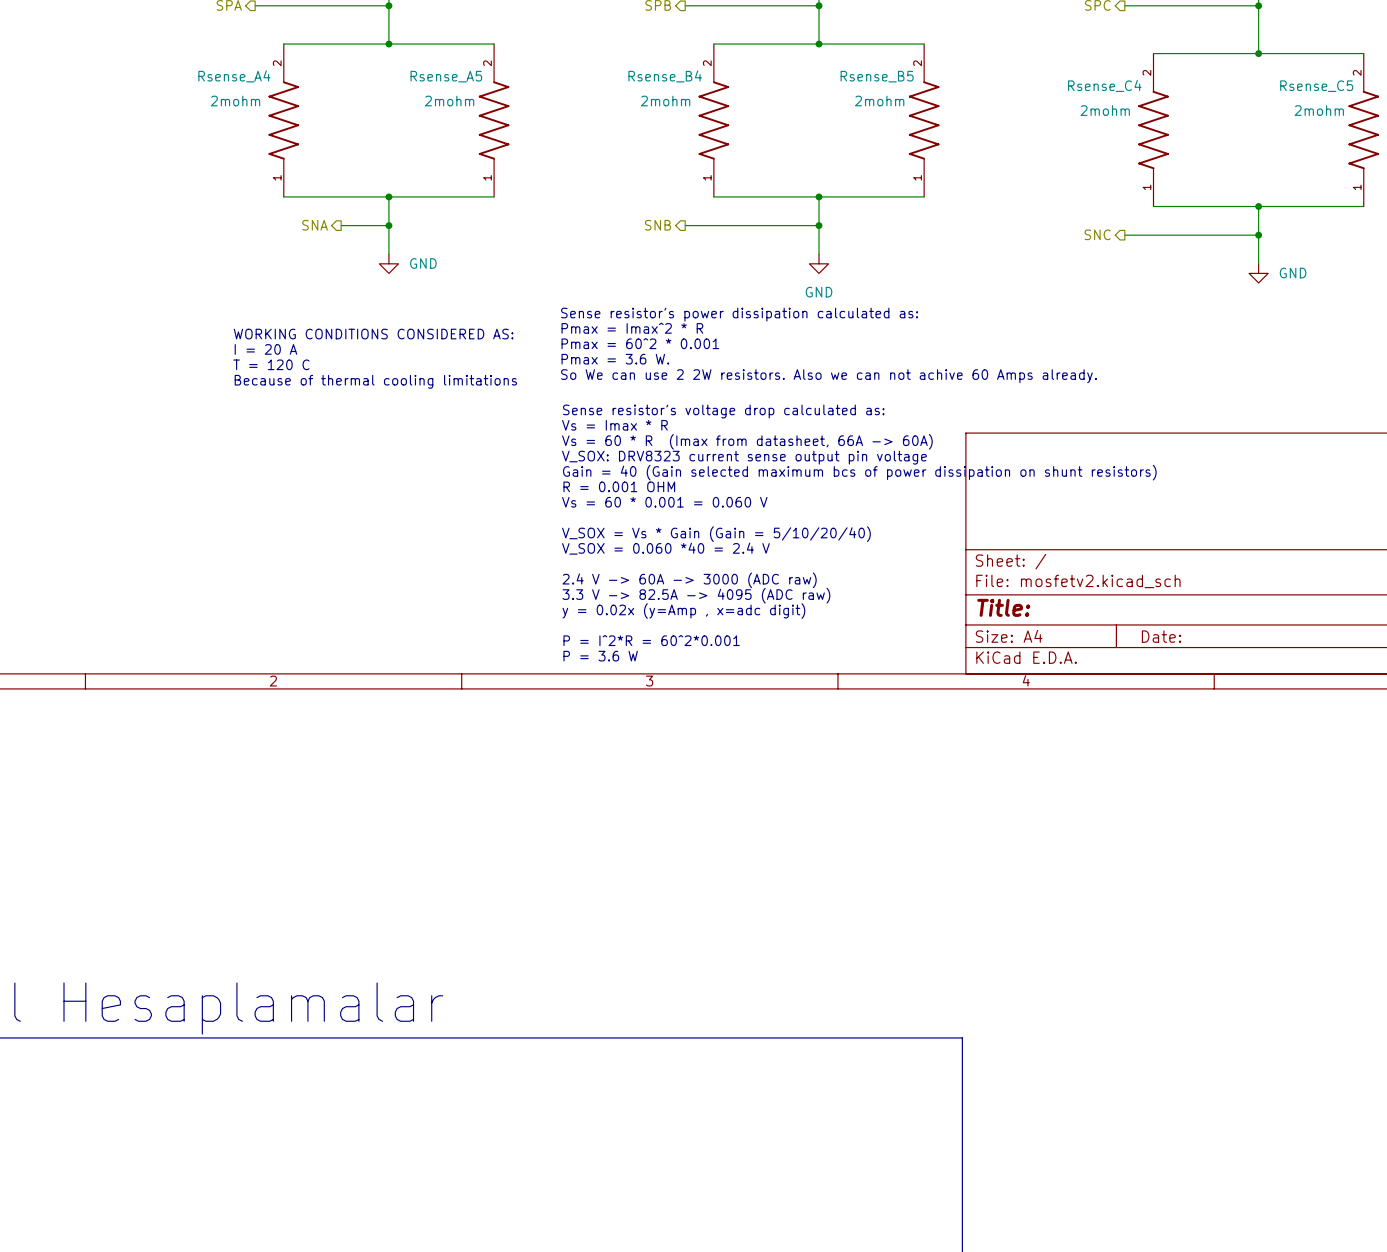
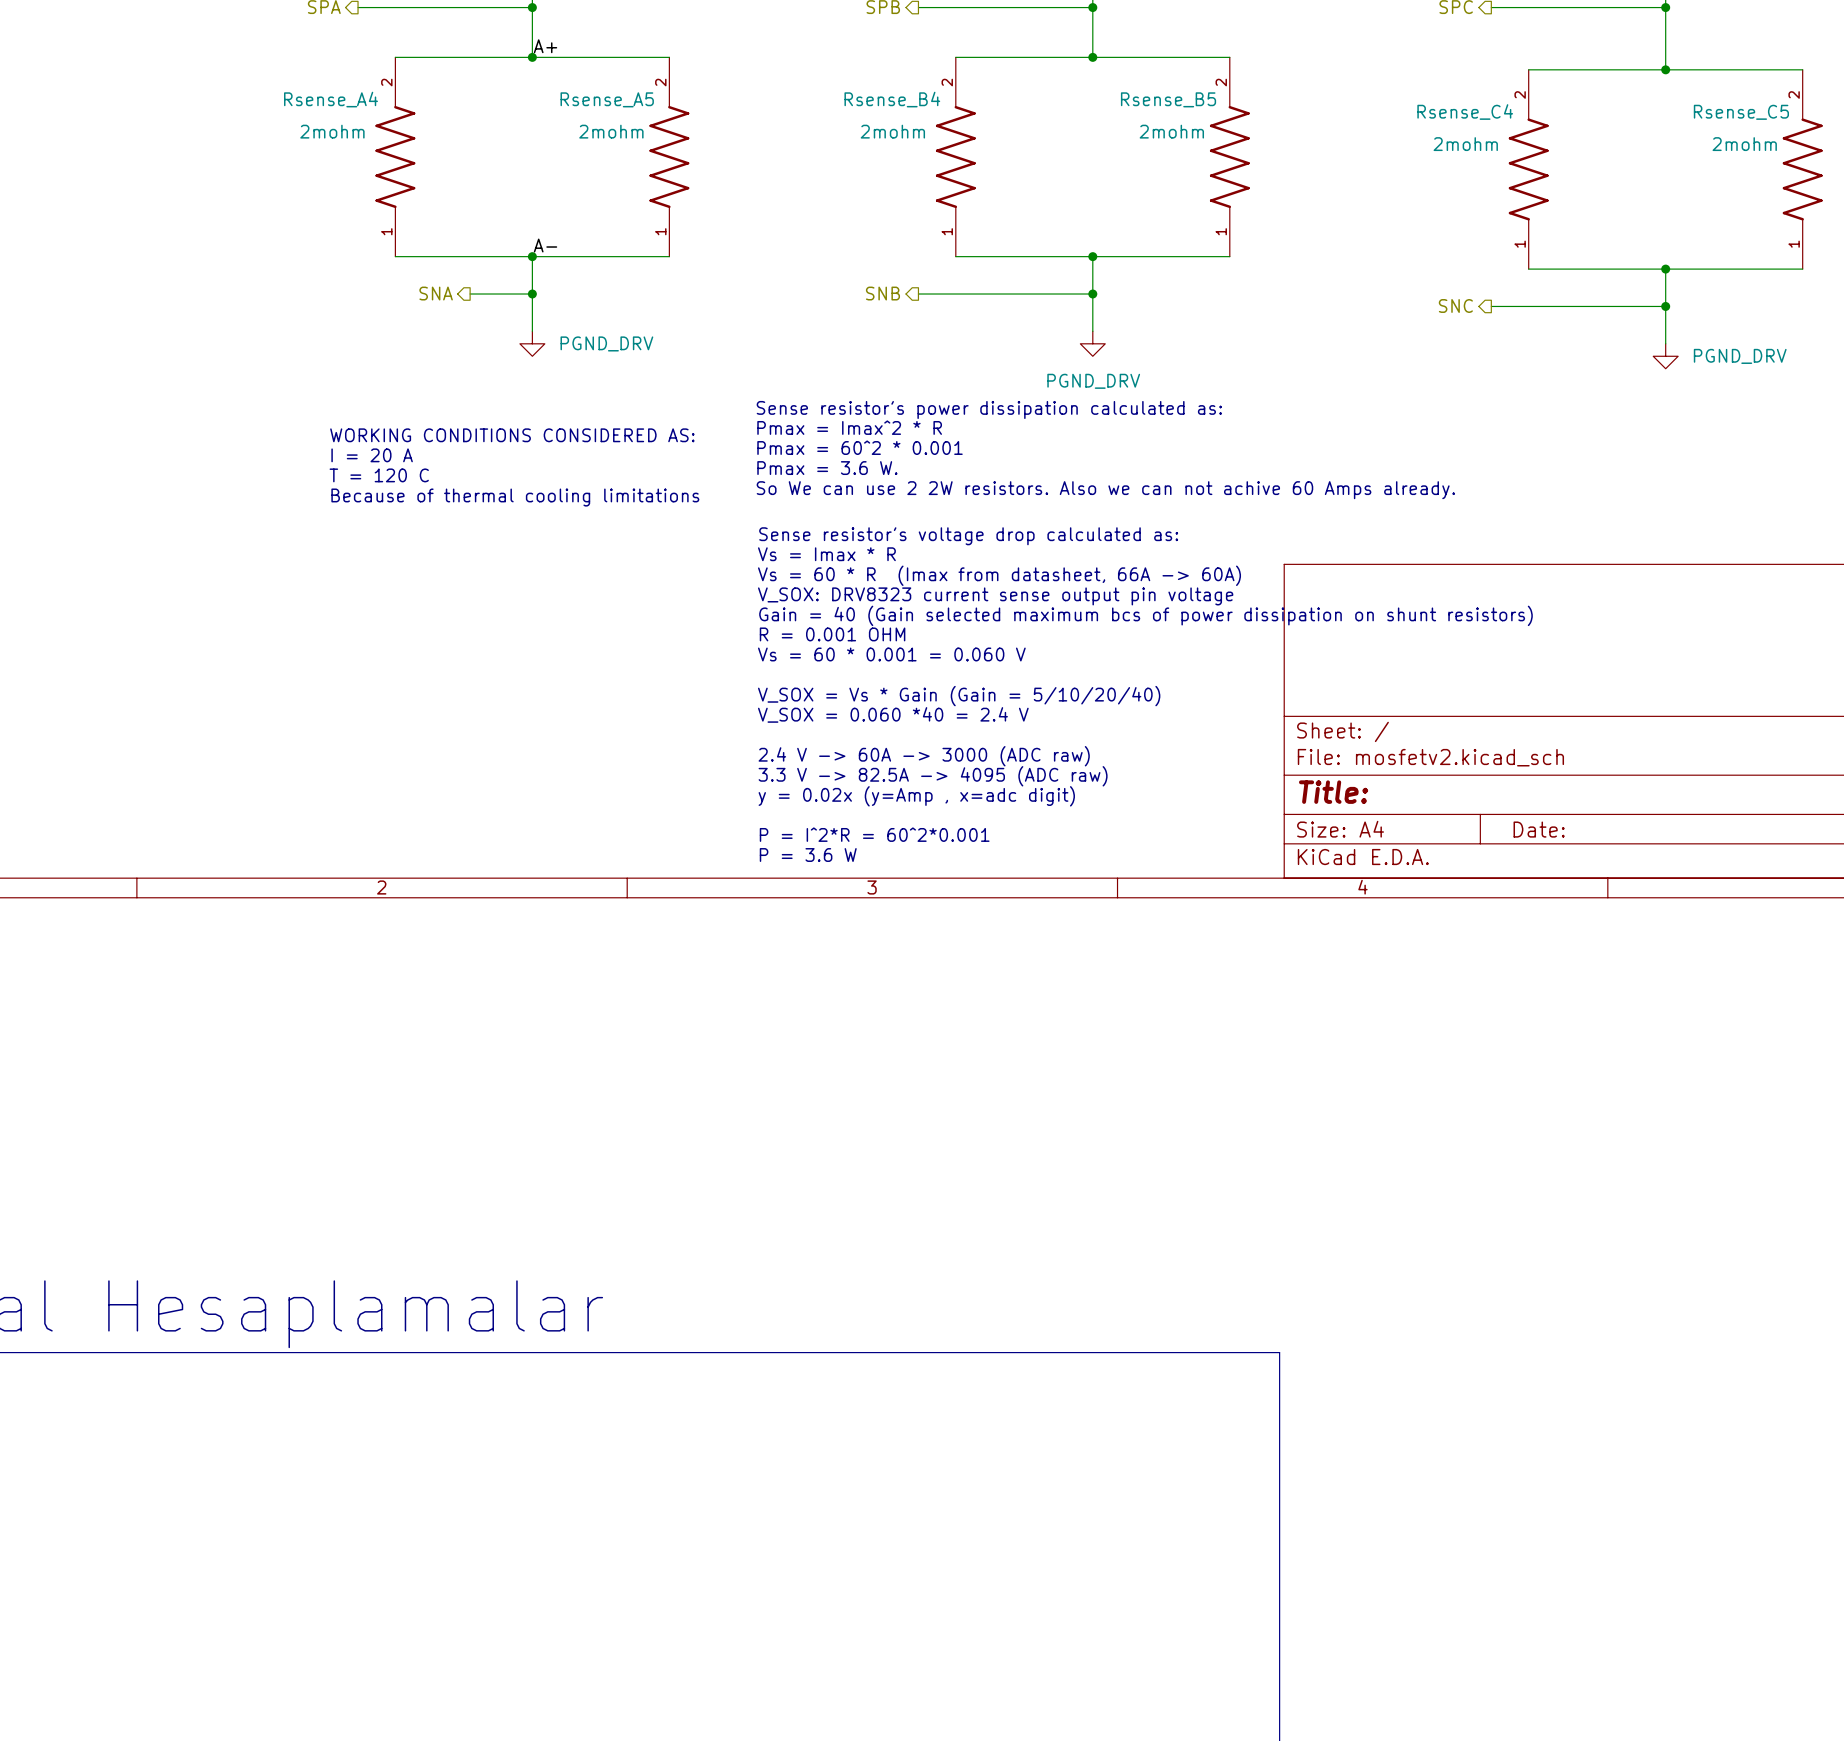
label: none -> A+ (545, 46)
label: none -> A- (545, 245)
power symbol: GND (388, 263) -> PGND_DRV (532, 343)
power symbol: GND (819, 263) -> PGND_DRV (1092, 343)
power symbol: GND (1258, 273) -> PGND_DRV (1665, 356)

